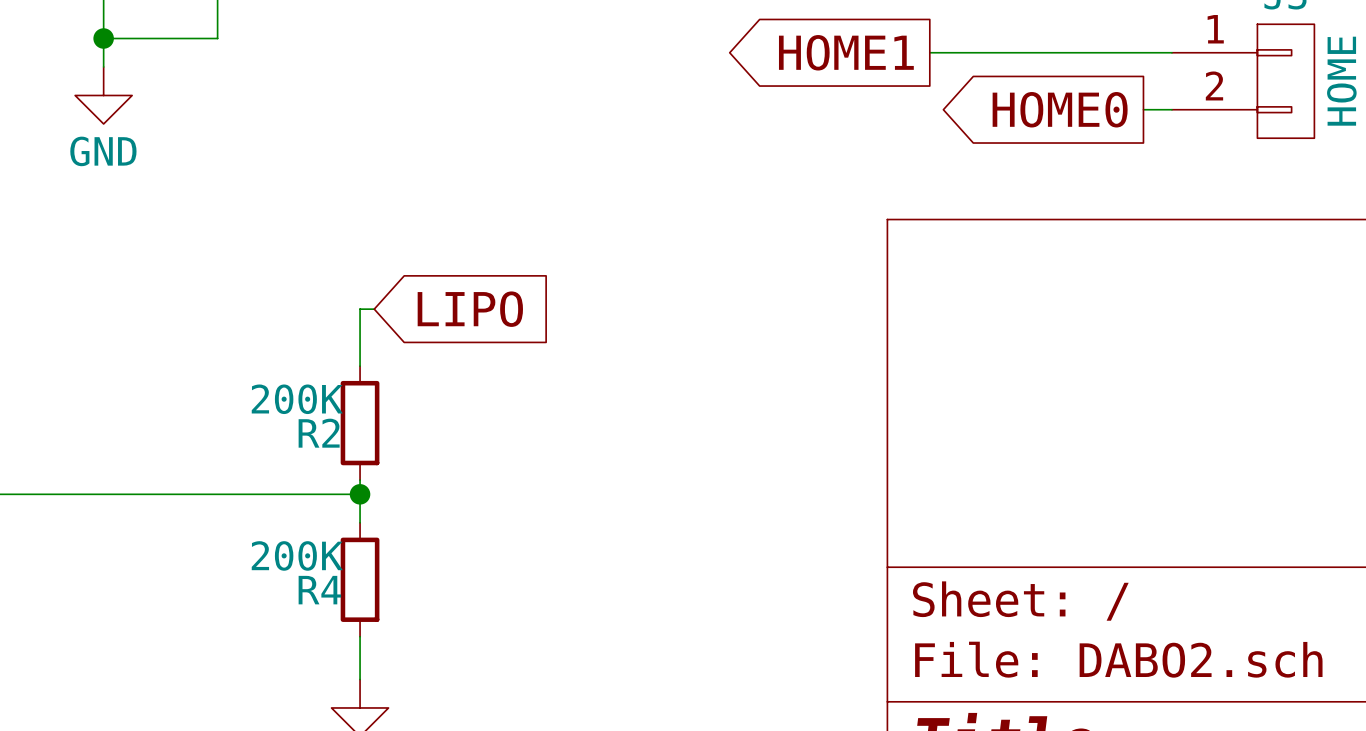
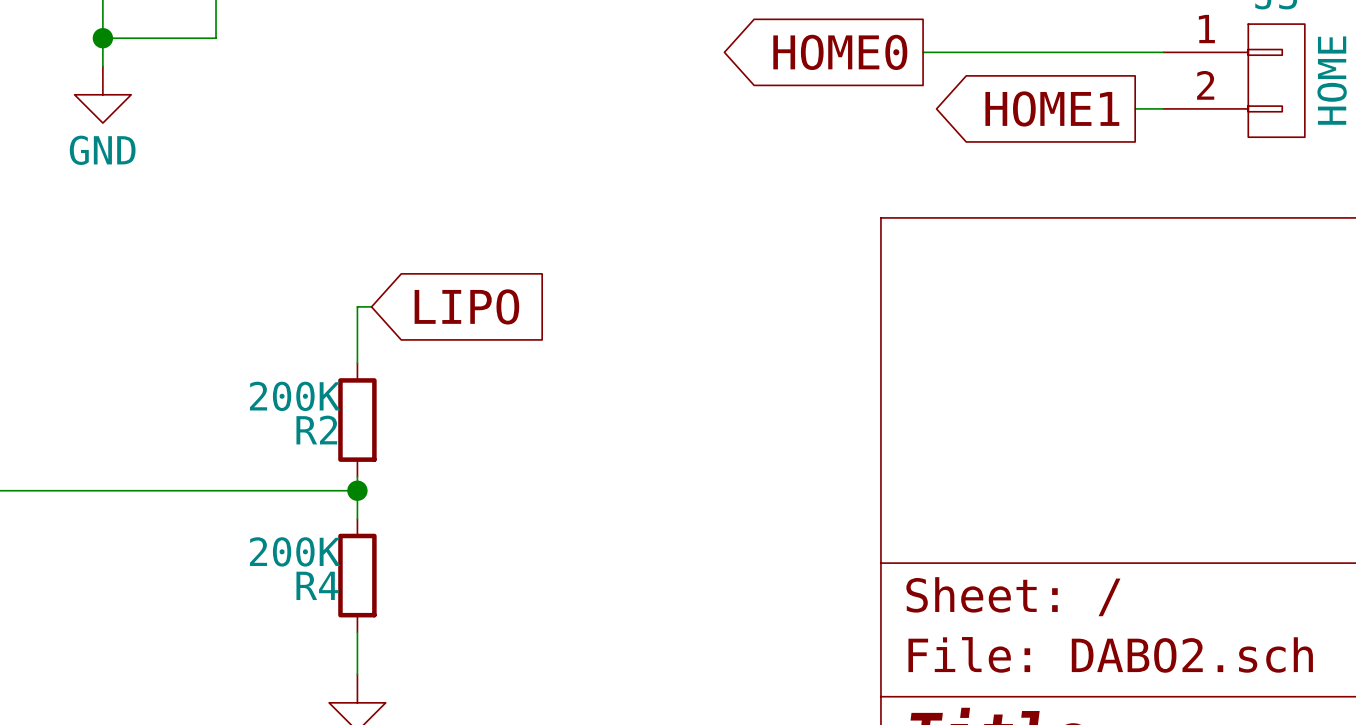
global label: HOME1 (846, 52) -> HOME0 (840, 52)
global label: HOME0 (1060, 109) -> HOME1 (1052, 108)

